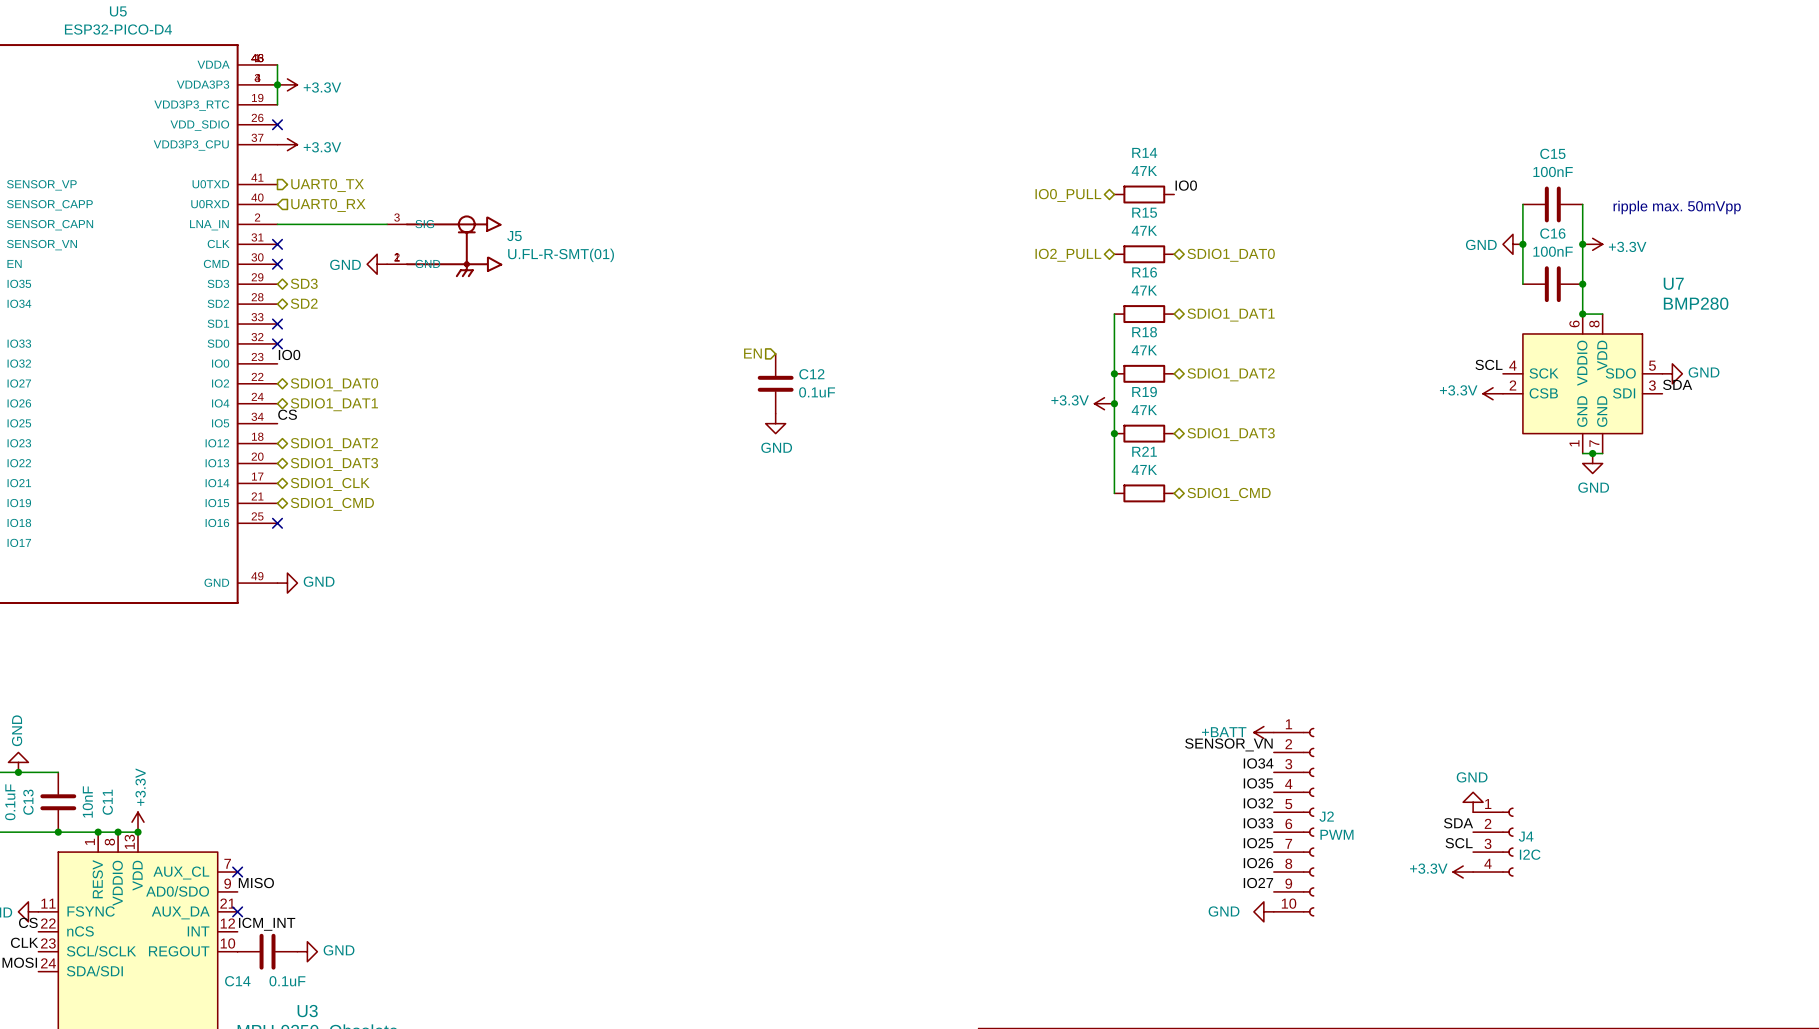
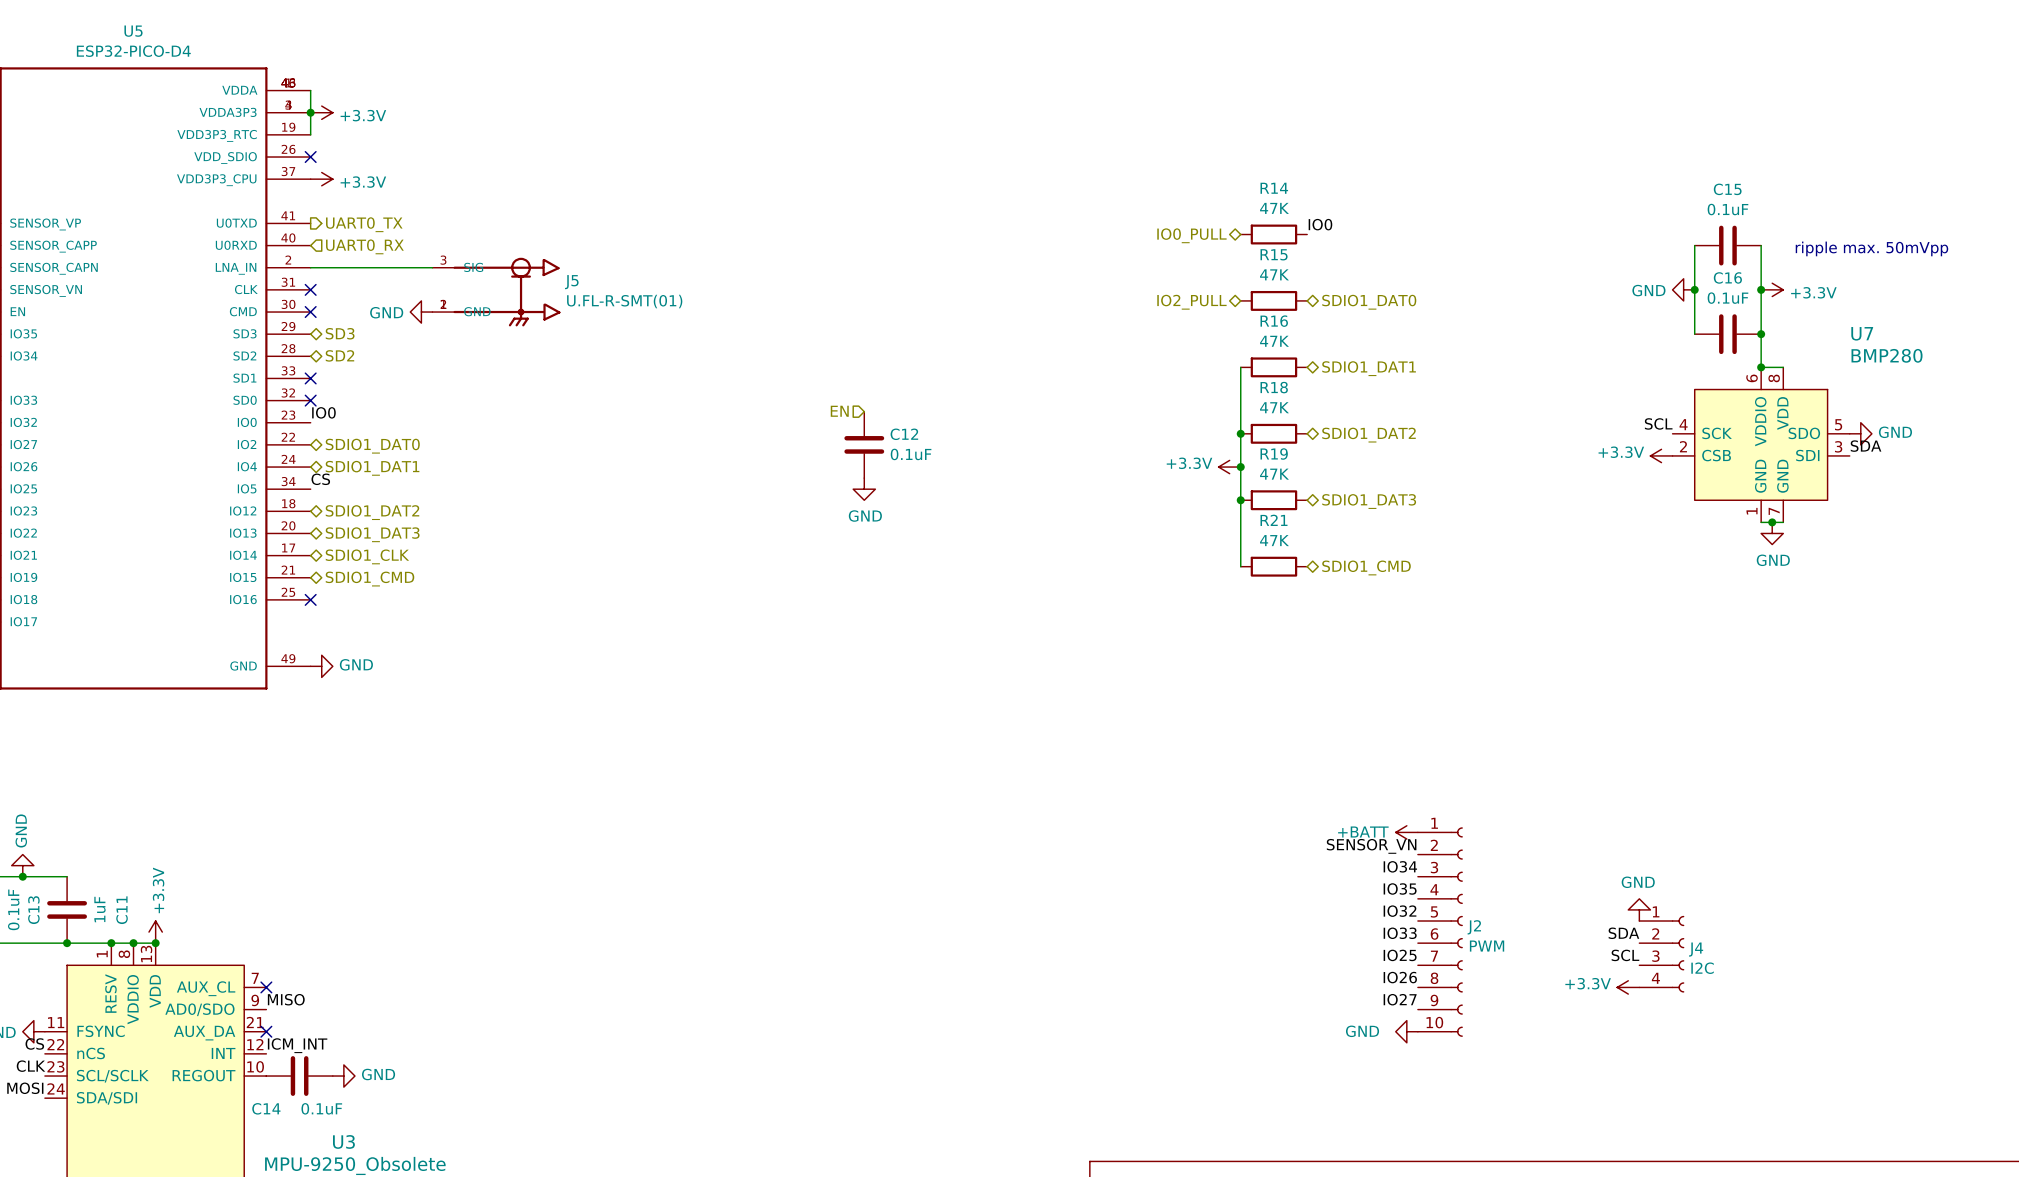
C15 value: 100nF (1553, 172) -> 0.1uF (1727, 209)
C16 value: 100nF (1553, 251) -> 0.1uF (1727, 298)
C11 value: 10nF (87, 802) -> 1uF (99, 909)

